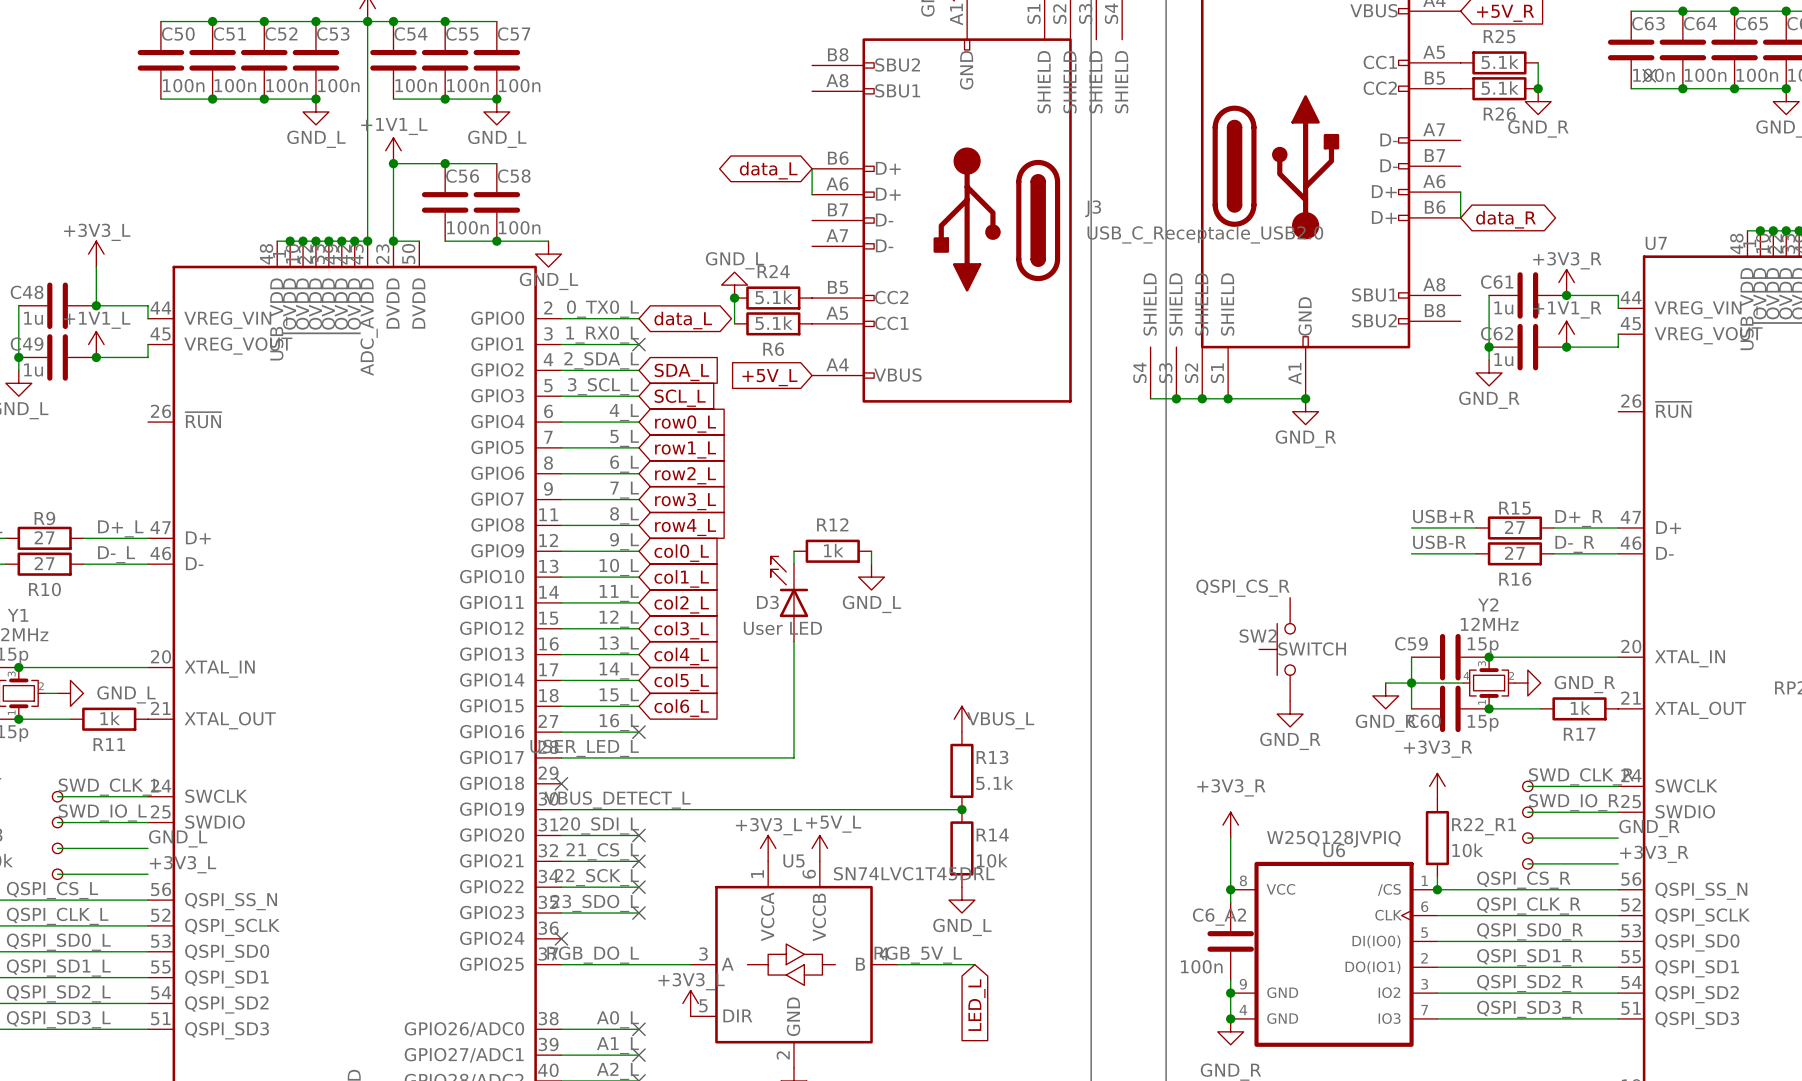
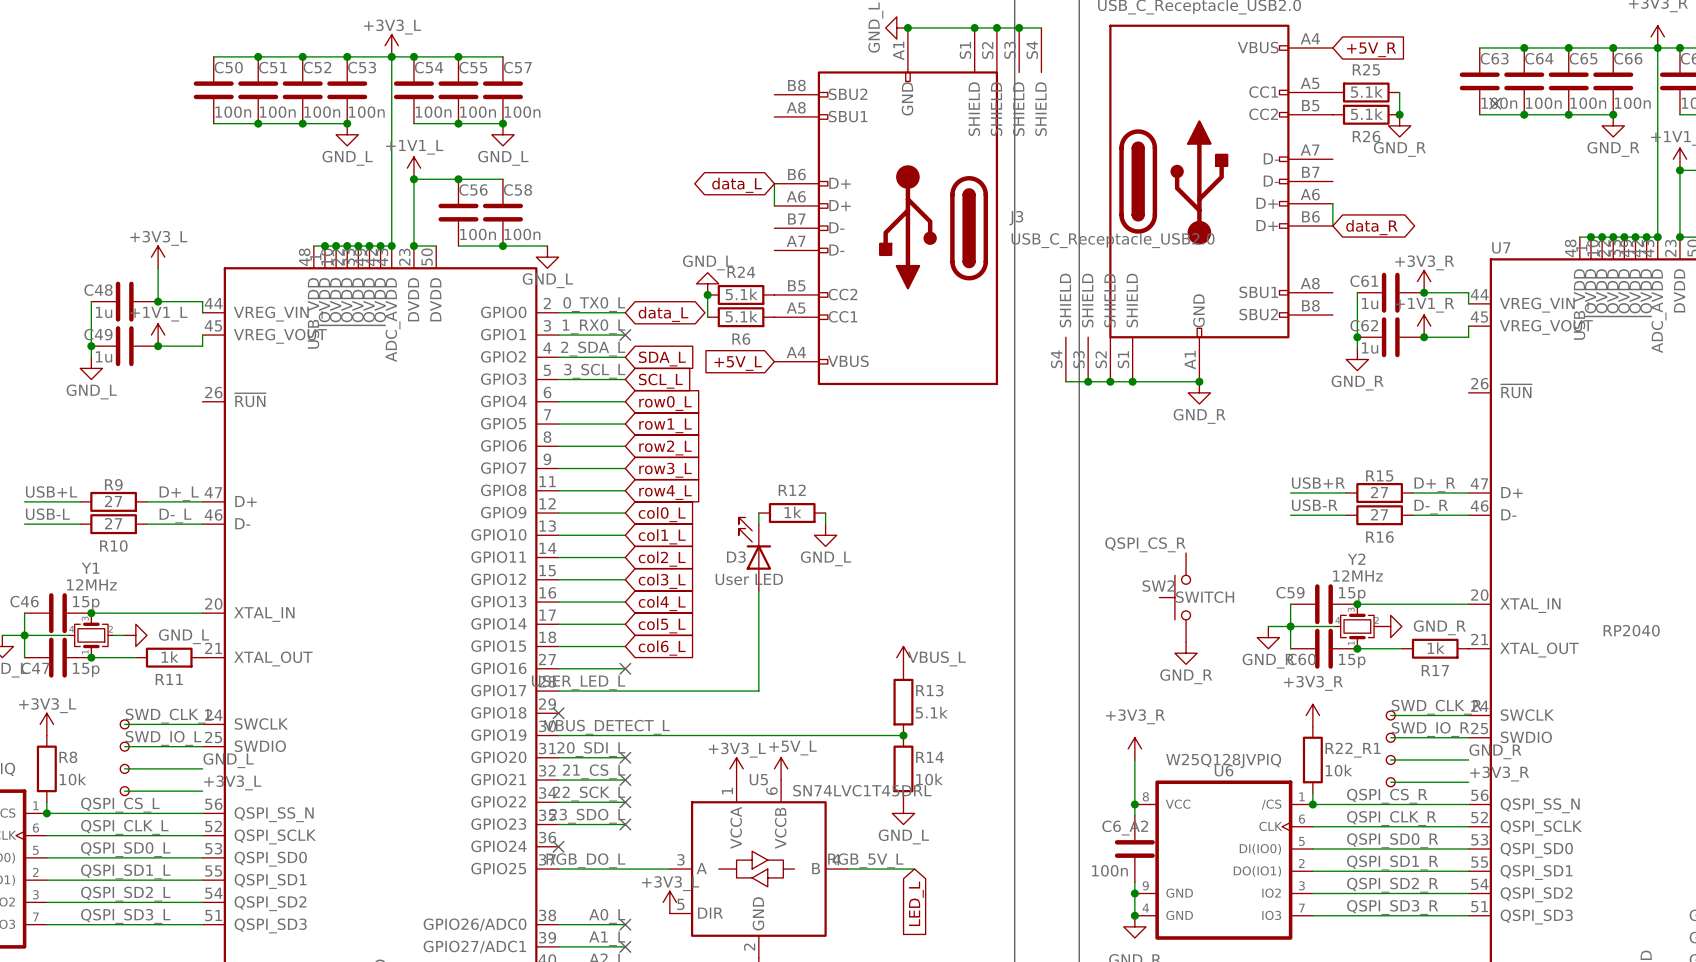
label: 4_L (624, 412) -> none
label: 5_L (624, 438) -> none
label: 6_L (624, 464) -> none
label: 7_L (624, 490) -> none
label: 8_L (624, 515) -> none
label: 9_L (624, 541) -> none
label: 10_L (619, 567) -> none
label: 11_L (619, 593) -> none
label: 12_L (619, 619) -> none
label: 13_L (619, 645) -> none
label: 14_L (619, 671) -> none
label: 15_L (619, 696) -> none
label: 16_L (619, 722) -> none

